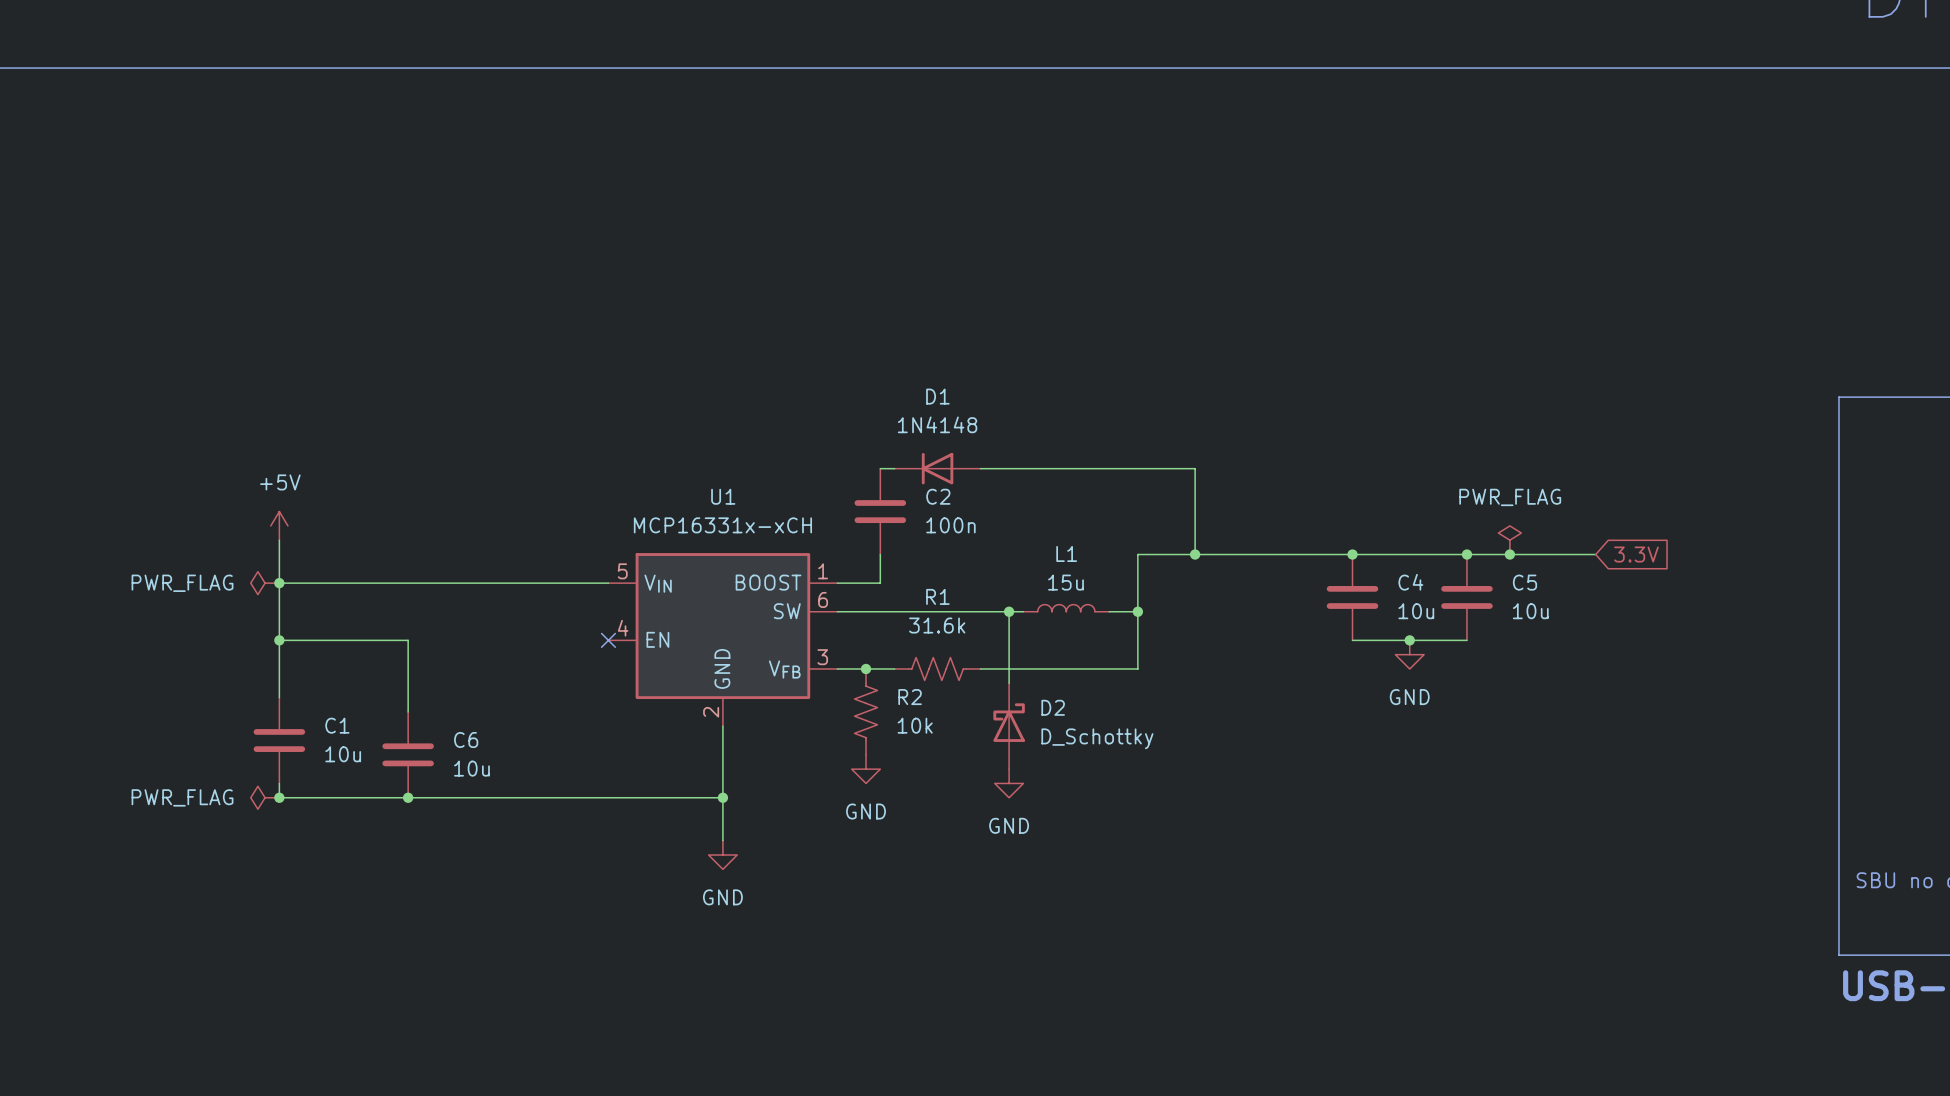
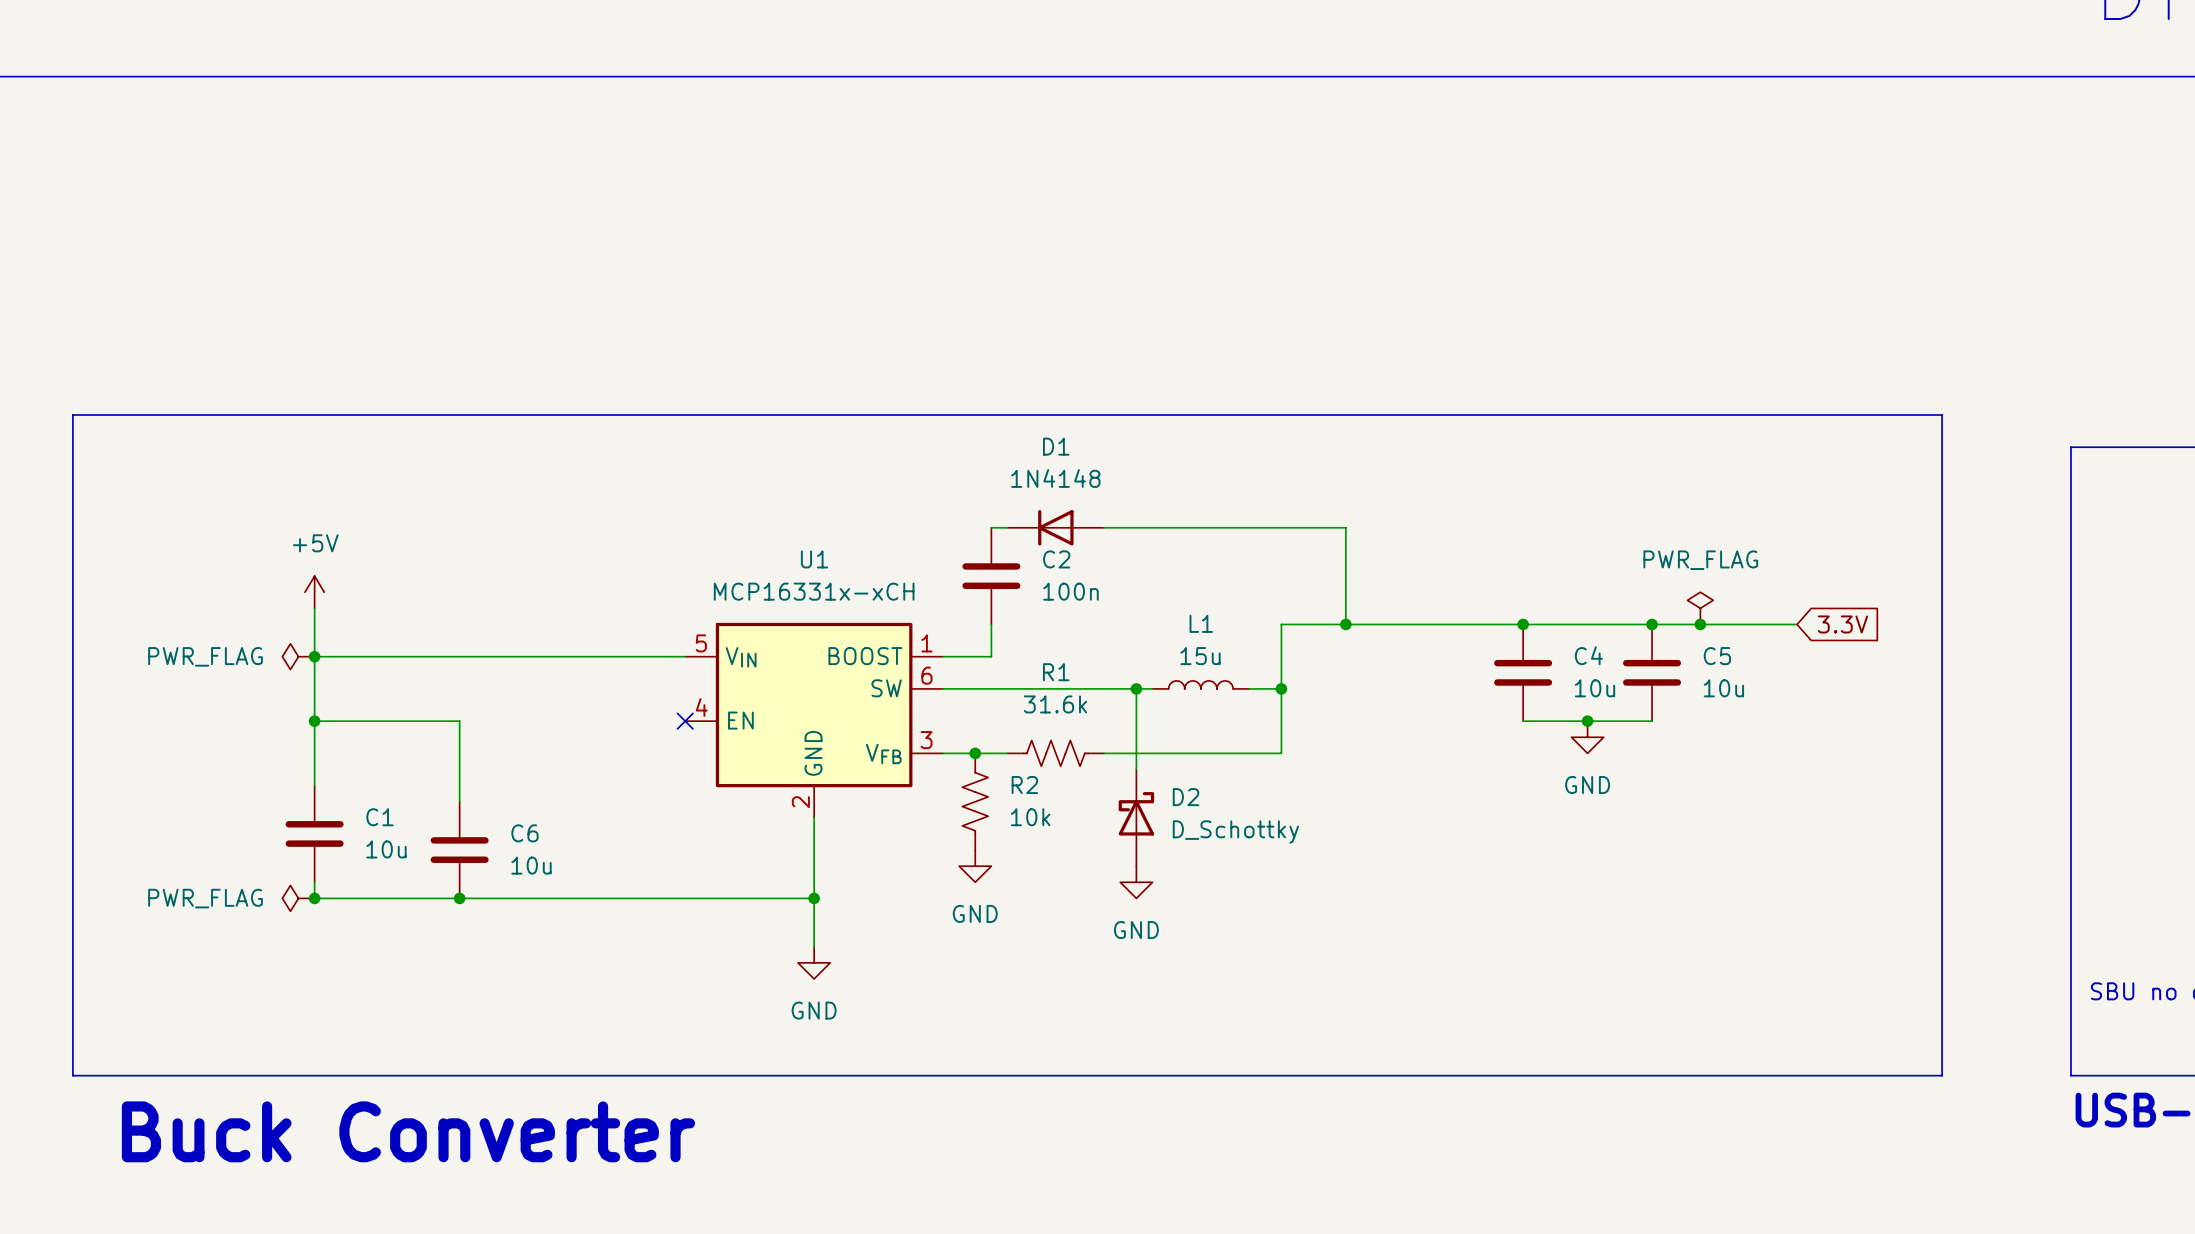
line: none -> (72, 415) (1942, 415) (1942, 1075) (72, 1075) (72, 415)
text: none -> Buck Converter (408, 1131)

